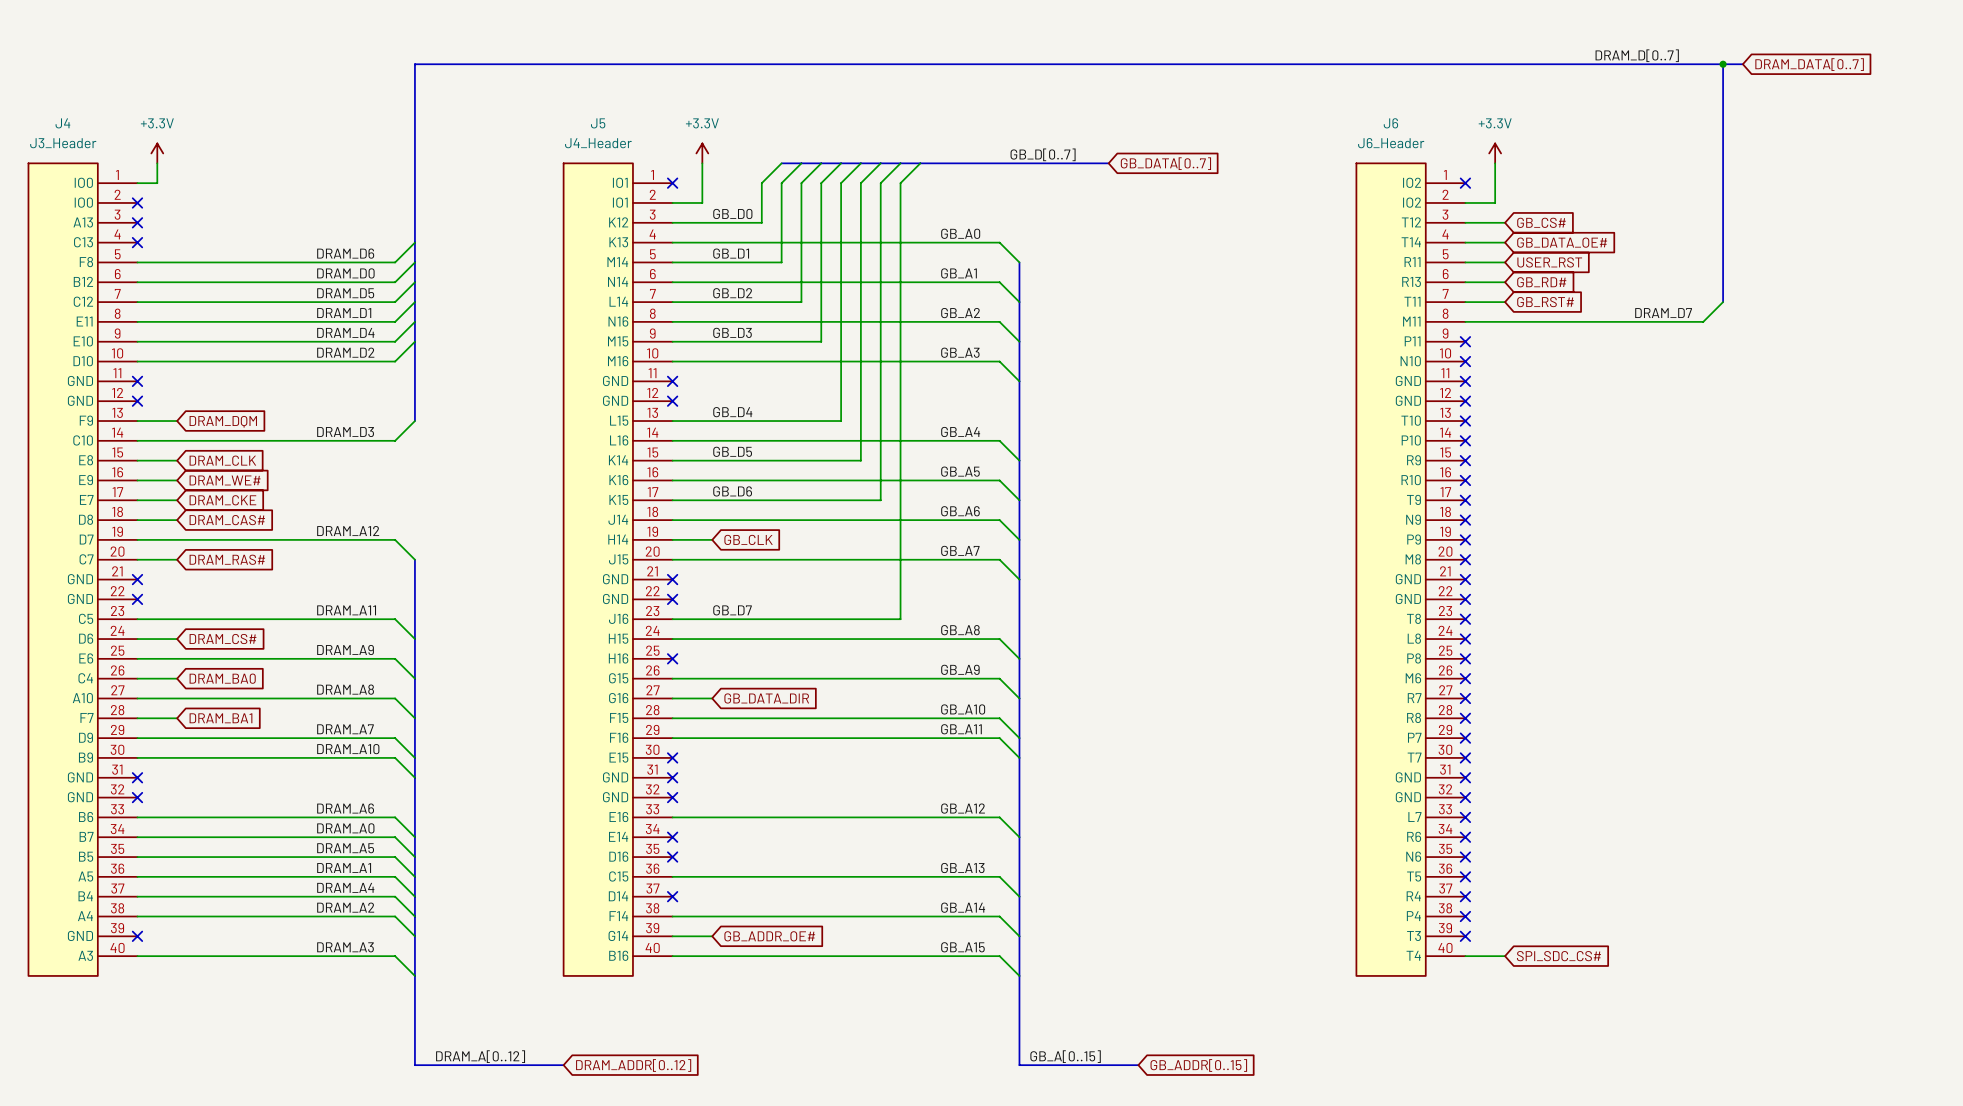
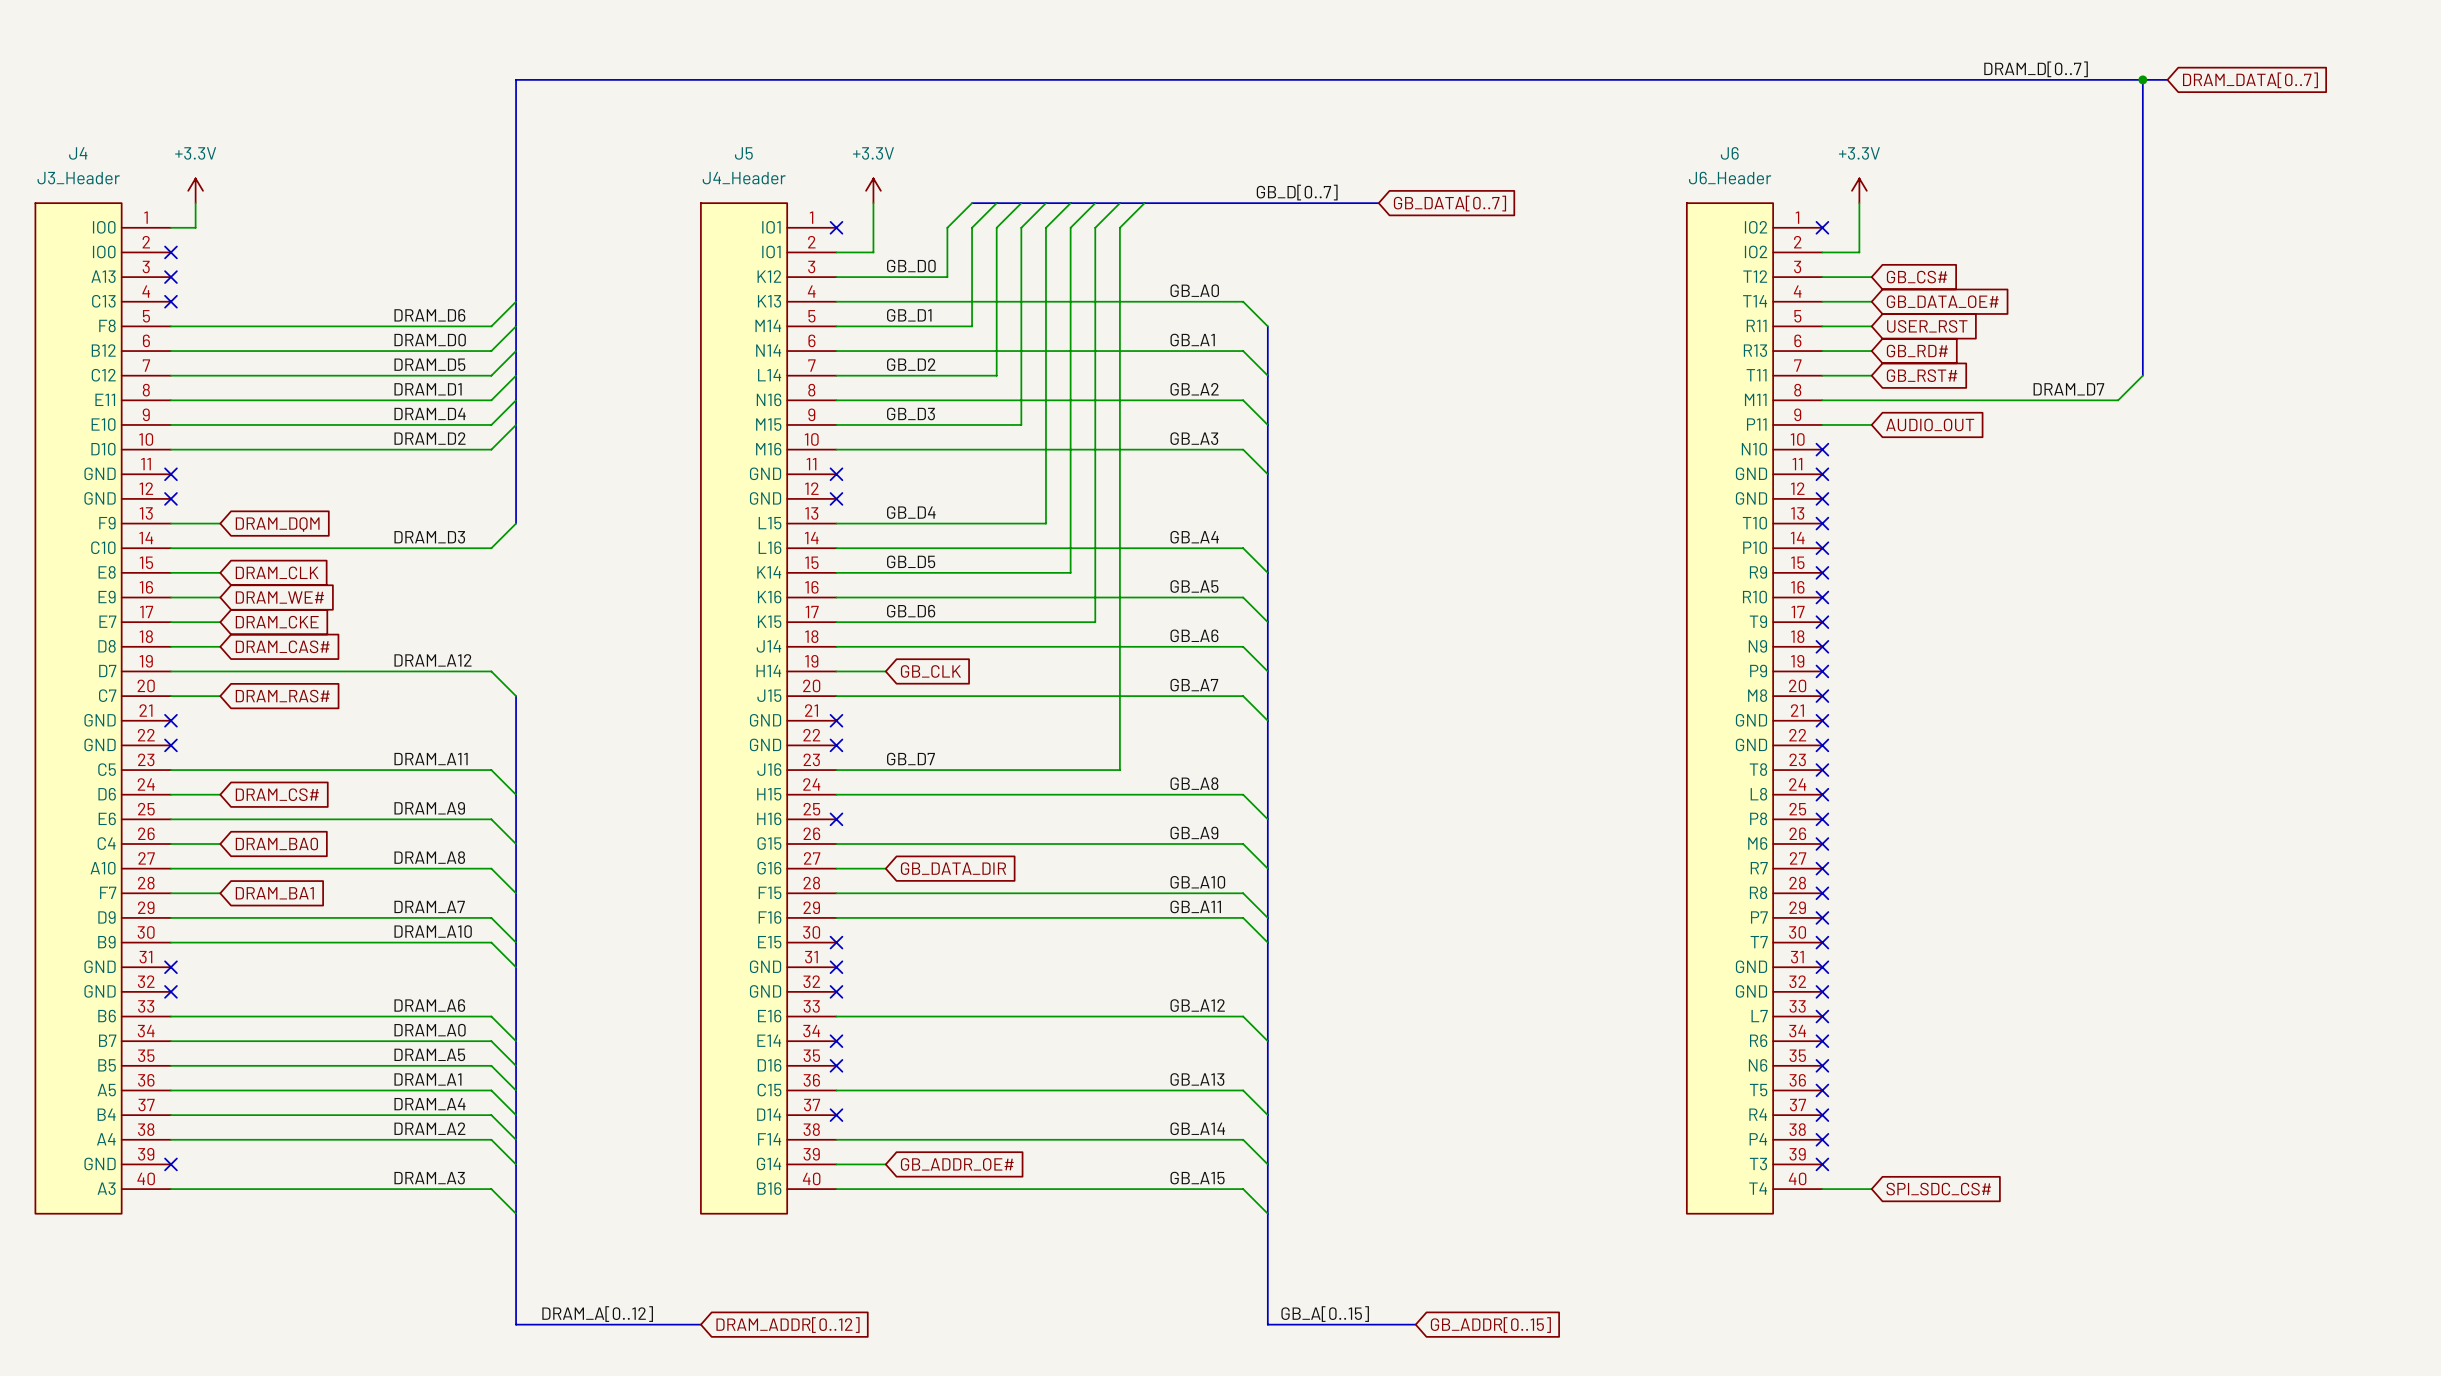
wire: none -> (1822, 424) (1871, 424)
no-connect mark: (1465, 341) -> none
global label: none -> AUDIO_OUT (1930, 424)

